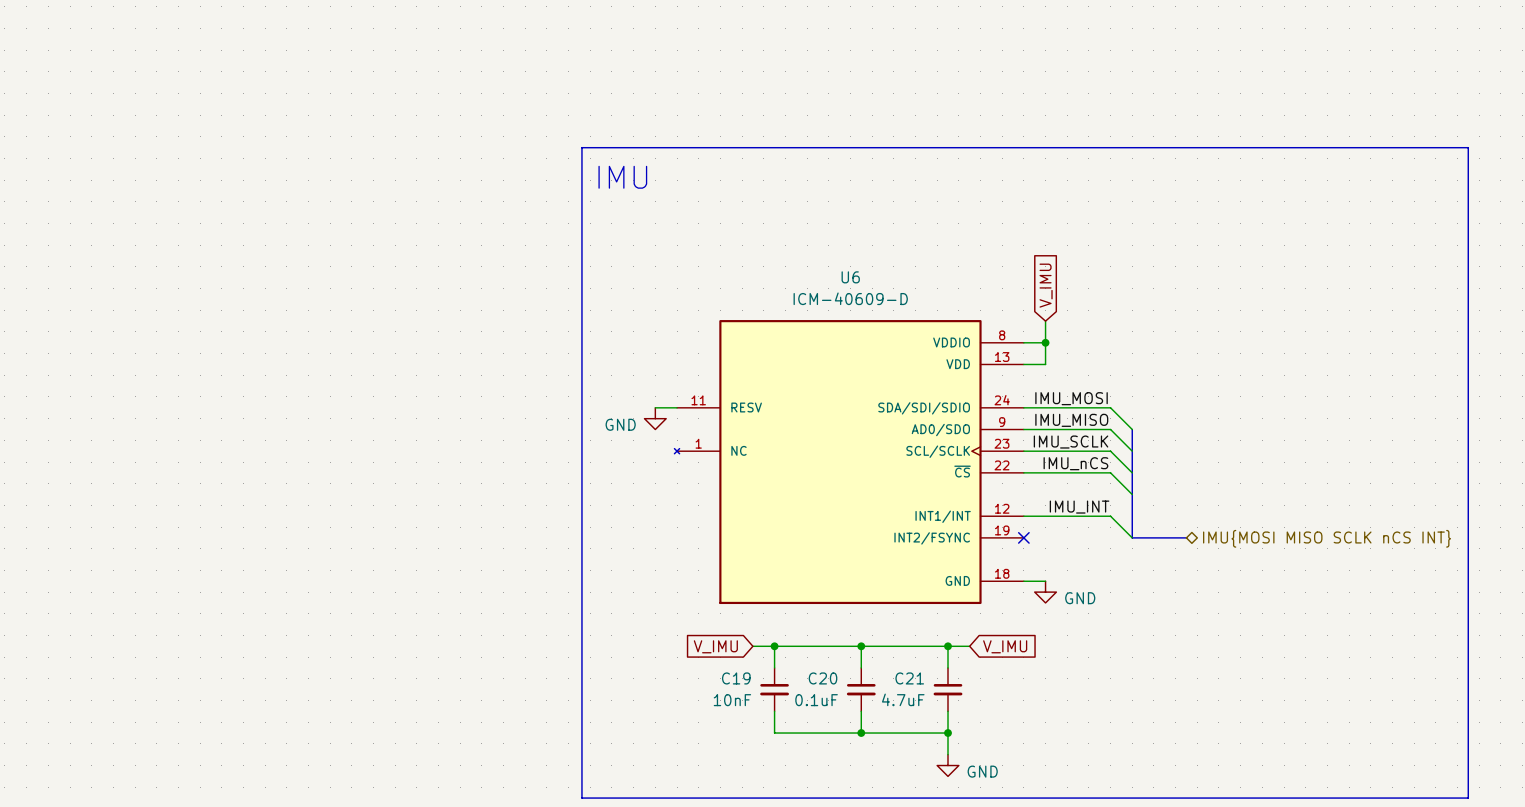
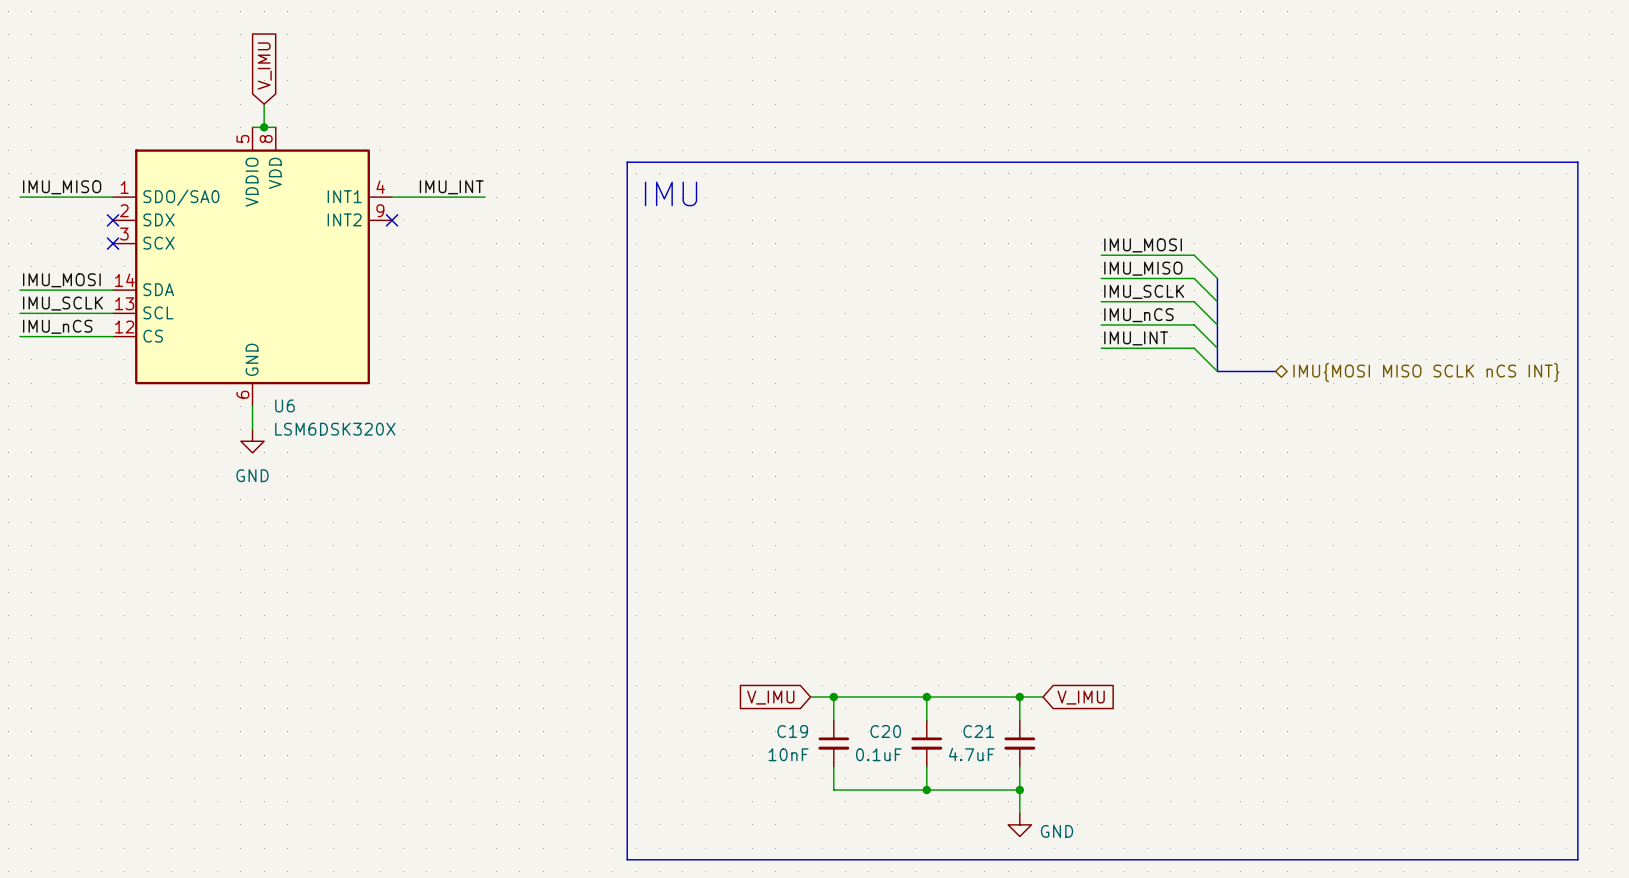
global label: none -> V_IMU (264, 66)
wire: none -> (264, 104) (264, 127)
wire: none -> (252, 127) (275, 127)
junction: none -> (264, 127)
label: none -> IMU_MISO (62, 187)
label: none -> IMU_INT (451, 187)
wire: none -> (20, 197) (113, 197)
wire: none -> (392, 197) (485, 197)
no-connect mark: none -> (113, 220)
no-connect mark: none -> (392, 220)
no-connect mark: none -> (113, 243)
wire: none -> (1101, 255) (1194, 255) (1217, 278)
bus: none -> (1217, 278) (1217, 371) (1275, 371)
label: none -> IMU_MOSI (61, 280)
wire: none -> (20, 290) (113, 290)
U6 name position: U6 (850, 277) -> U6 (284, 405)
label: none -> IMU_SCLK (62, 303)
global label: V_IMU (1046, 285) -> none
wire: none -> (20, 313) (113, 313)
U6 value: ICM-40609-D (850, 298) -> LSM6DSK320X (335, 429)
label: none -> IMU_nCS (57, 326)
wire: none -> (20, 336) (113, 336)
label: none -> IMU_INT (1136, 338)
U6 symbol: [674, 320, 1024, 605] -> [113, 127, 393, 407]
wire: (1045, 321) (1045, 364) (1023, 364) -> none
wire: (1023, 342) (1045, 342) -> none
junction: (1045, 342) -> none
wire: none -> (252, 406) (252, 429)
label position: IMU_MOSI (1071, 398) -> IMU_MOSI (1143, 245)
power symbol: none -> GND (252, 441)
wire: (655, 407) (677, 407) -> none
wire: (1023, 407) (1110, 407) (1132, 429) -> (1101, 278) (1194, 278) (1217, 301)
power symbol: GND (655, 418) -> none
label position: IMU_MISO (1071, 420) -> IMU_MISO (1143, 268)
wire: (1023, 429) (1110, 429) (1132, 451) -> (1101, 301) (1194, 301) (1217, 324)
bus: (1132, 429) (1132, 537) (1186, 537) -> none
label position: IMU_SCLK (1071, 442) -> IMU_SCLK (1144, 291)
wire: (1023, 451) (1110, 451) (1132, 472) -> (1101, 324) (1194, 324) (1217, 348)
label position: IMU_nCS (1075, 463) -> IMU_nCS (1138, 315)
wire: (1023, 472) (1110, 472) (1132, 494) -> (1101, 348) (1194, 348) (1217, 371)
label: IMU_INT (1079, 507) -> none
wire: (1023, 516) (1110, 516) (1132, 537) -> none
no-connect mark: (1023, 537) -> none
hierarchical label position: IMU{MOSI MISO SCLK nCS INT} (1327, 538) -> IMU{MOSI MISO SCLK nCS INT} (1426, 372)
wire: (1023, 581) (1045, 581) -> none
power symbol: GND (1045, 592) -> none

